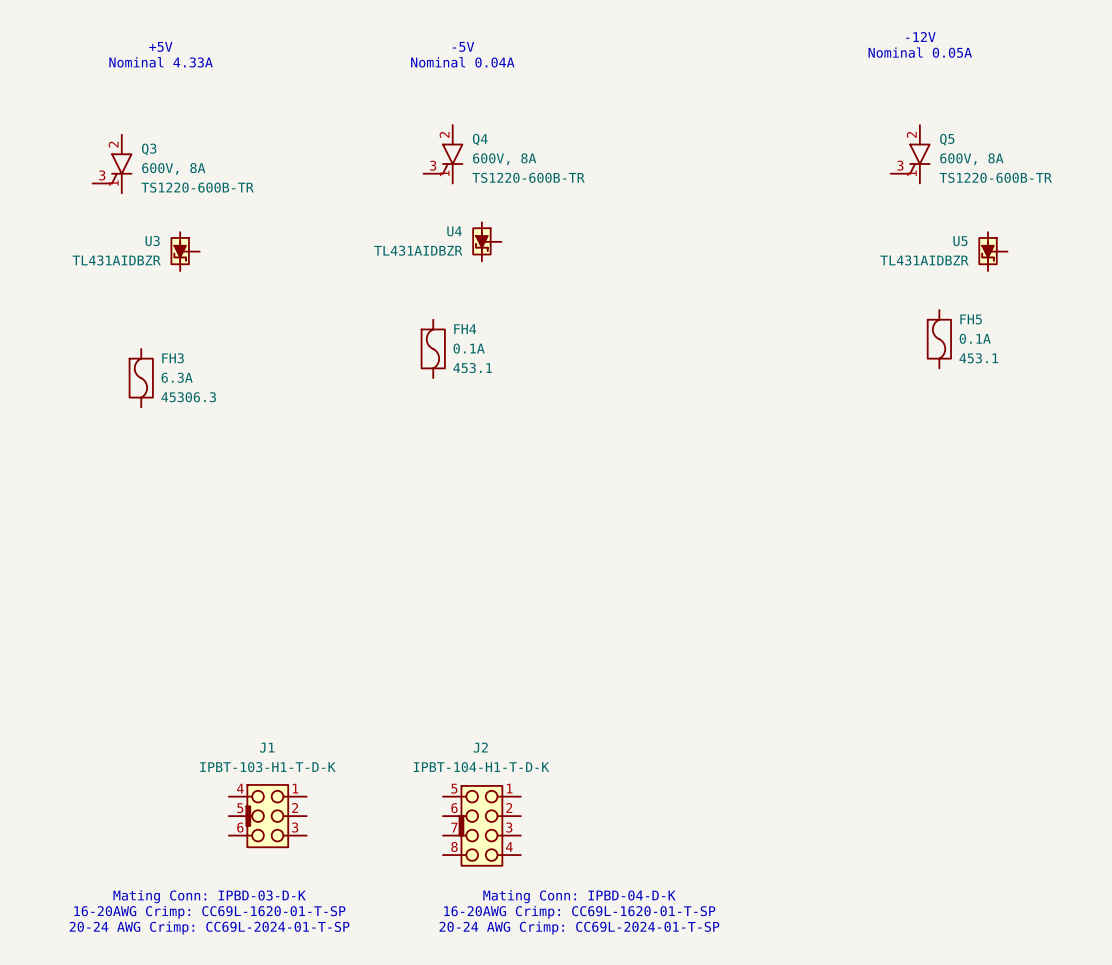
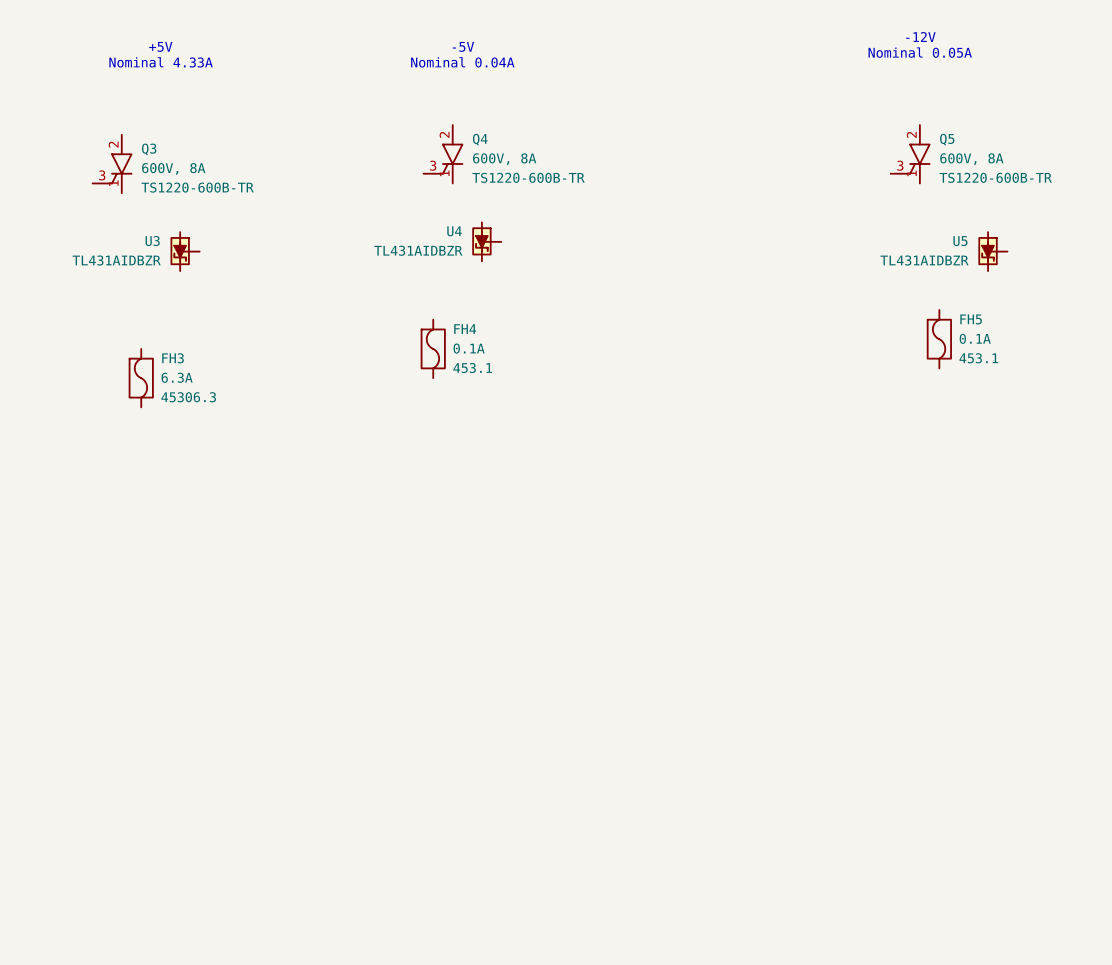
J1: (267, 816) -> none
J2: (481, 825) -> none
text: Mating Conn: IPBD-03-D-K (209, 896) -> none
text: Mating Conn: IPBD-04-D-K (579, 896) -> none
text: 16-20AWG Crimp: CC69L-1620-01-T-SP (209, 912) -> none
text: 16-20AWG Crimp: CC69L-1620-01-T-SP (579, 912) -> none
text: 20-24 AWG Crimp: CC69L-2024-01-T-SP (209, 928) -> none
text: 20-24 AWG Crimp: CC69L-2024-01-T-SP (579, 928) -> none

